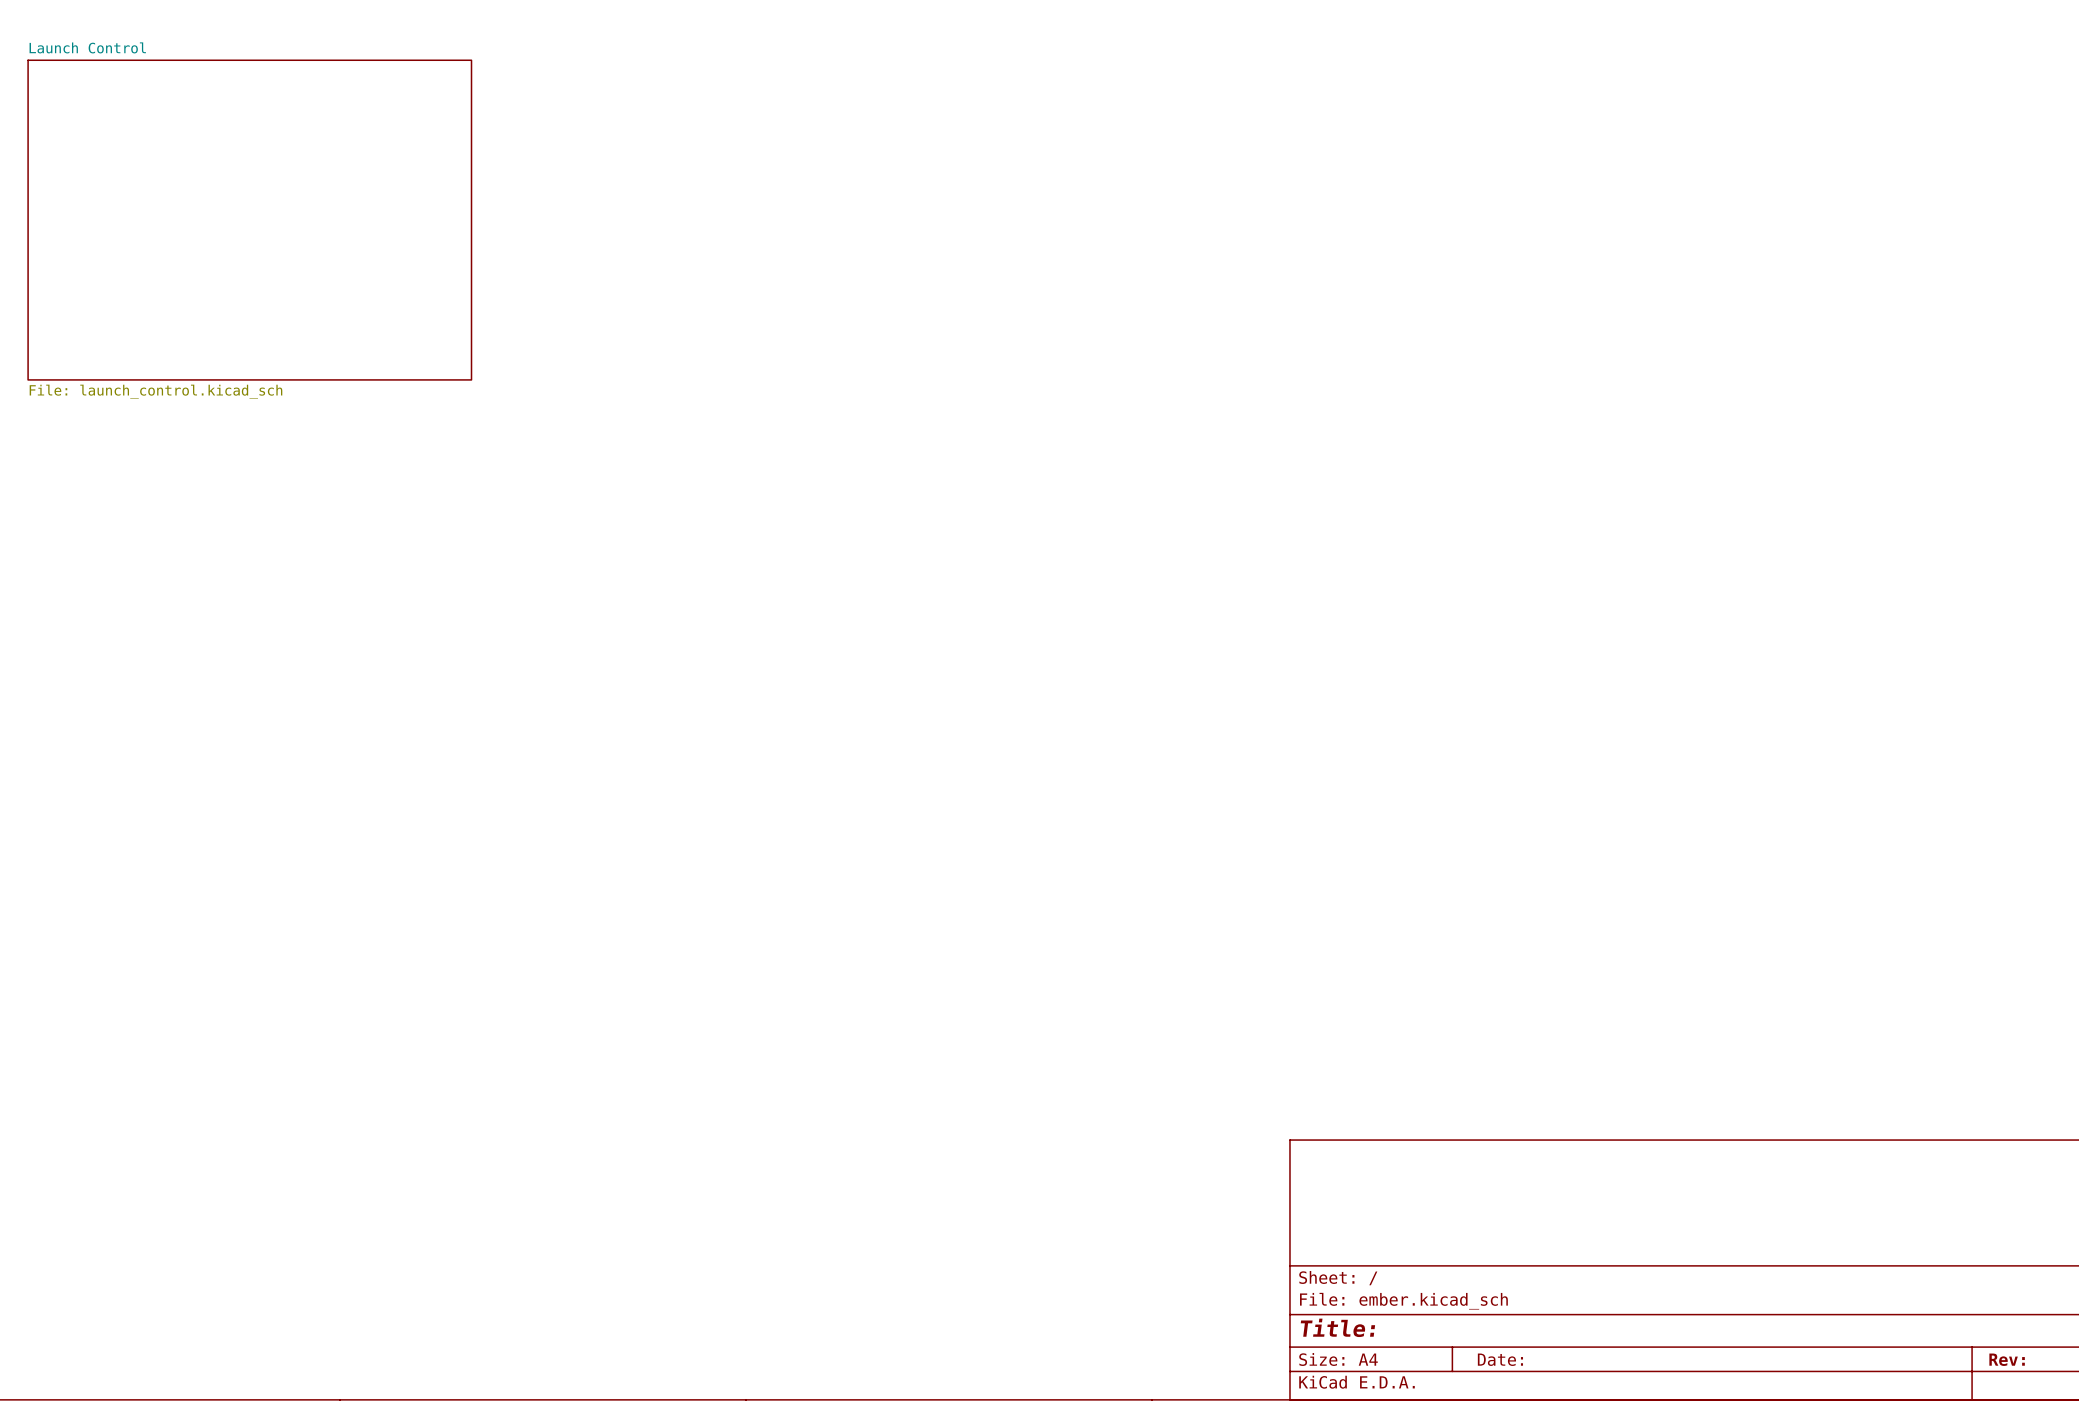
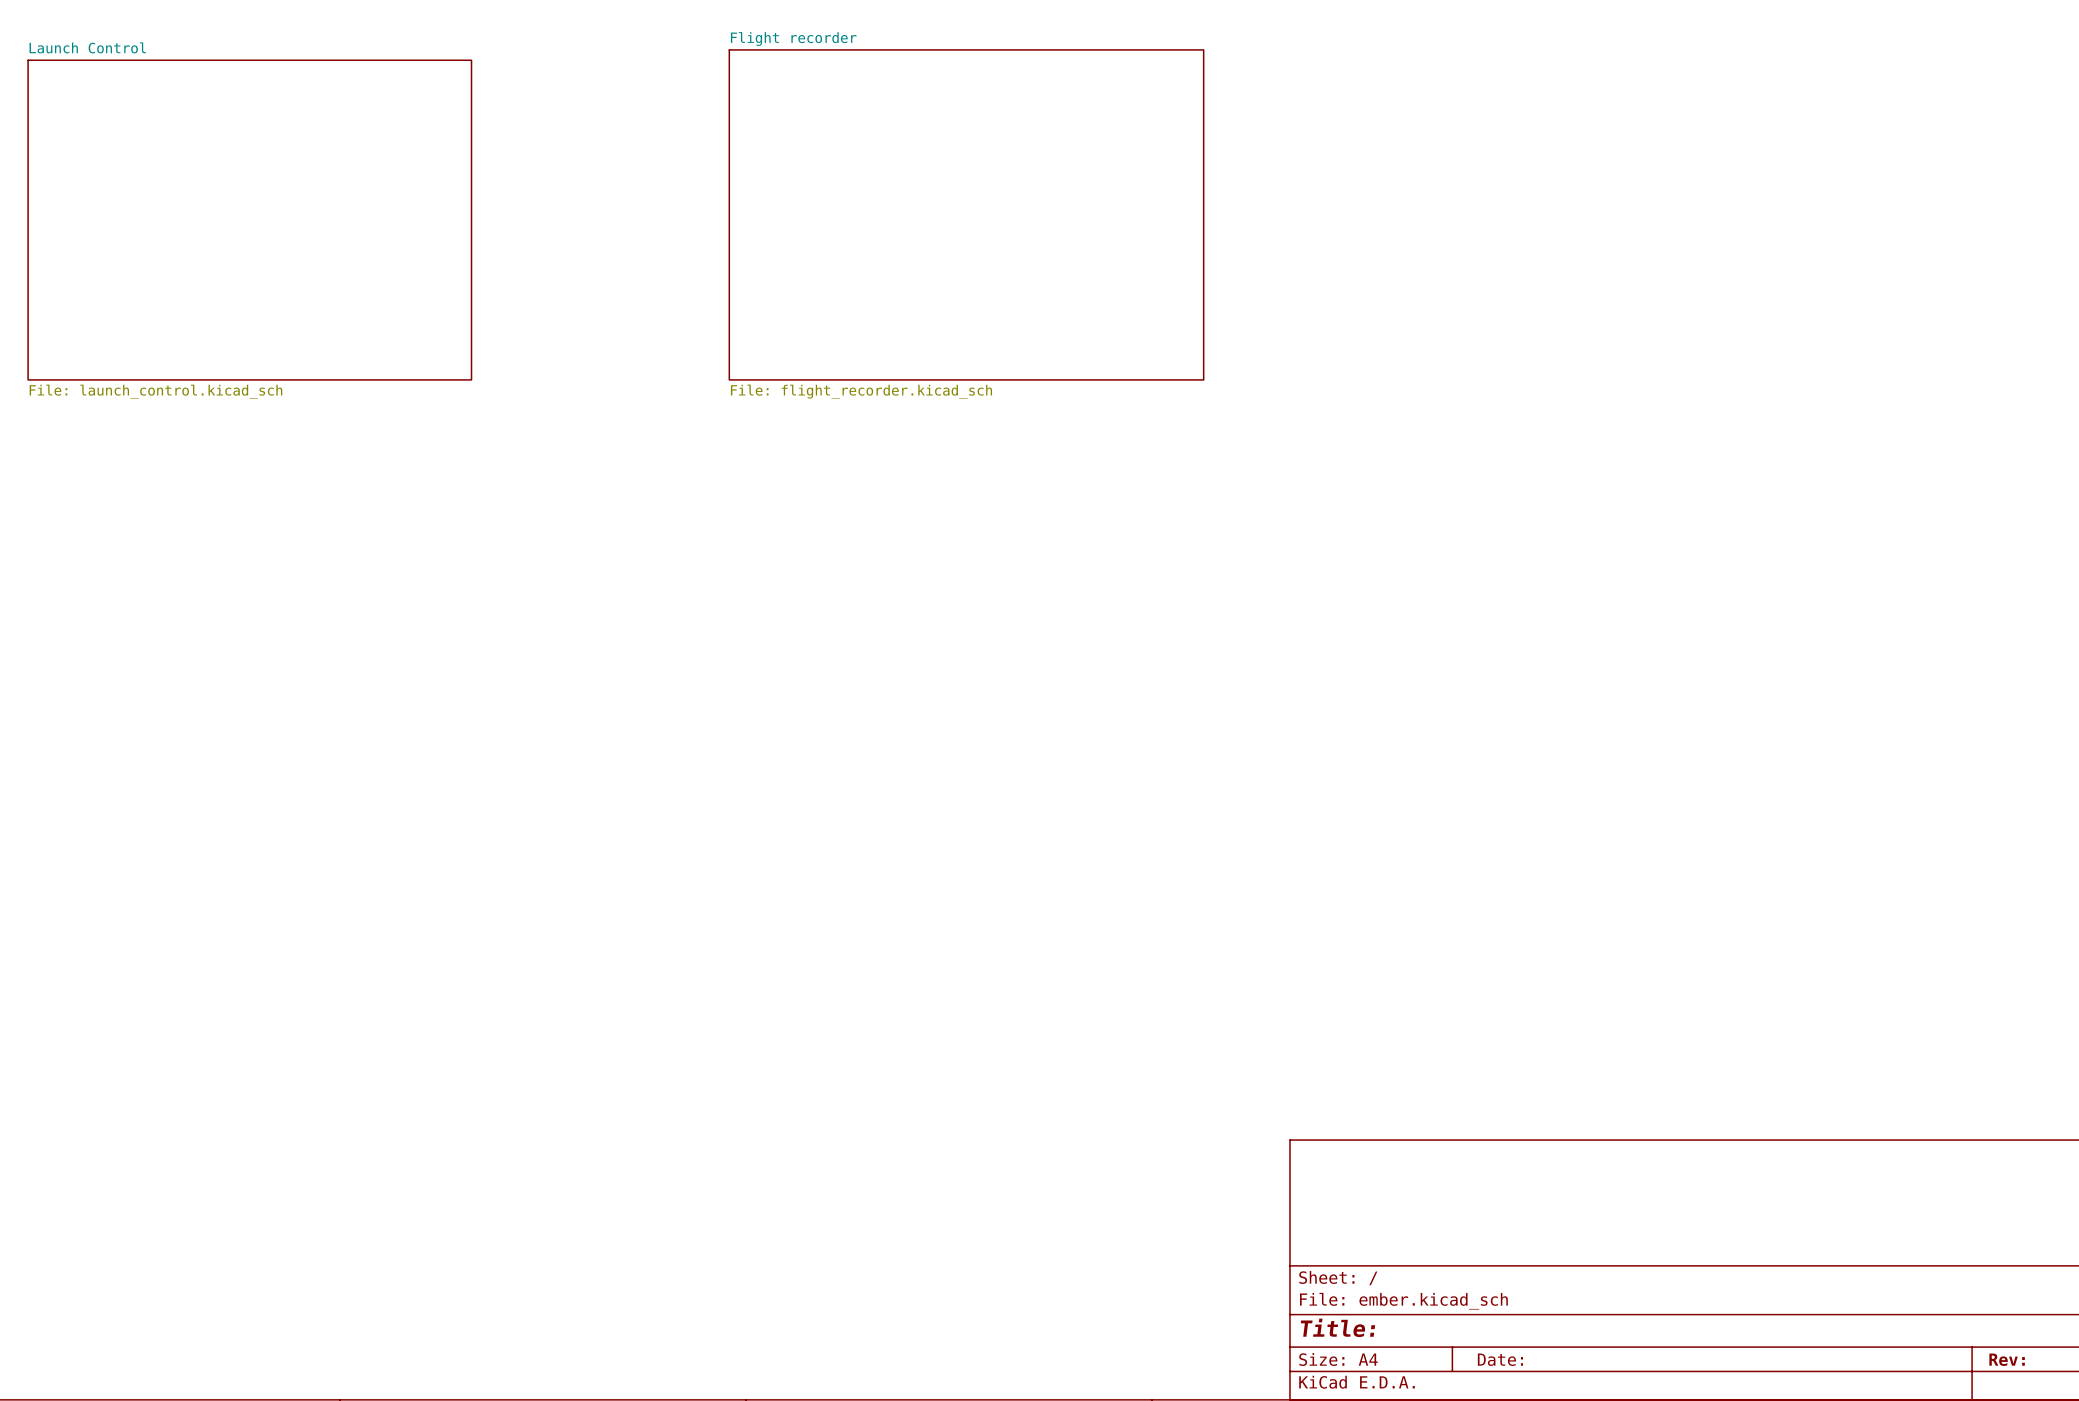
sheet Flight recorder: none -> File: flight_recorder.kicad_sch (966, 214)

